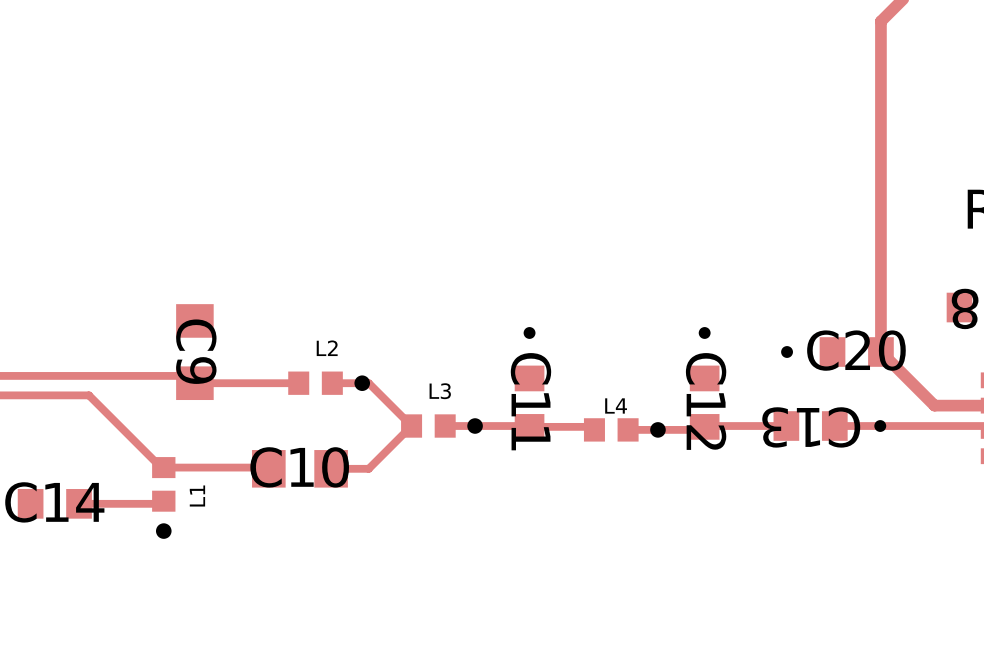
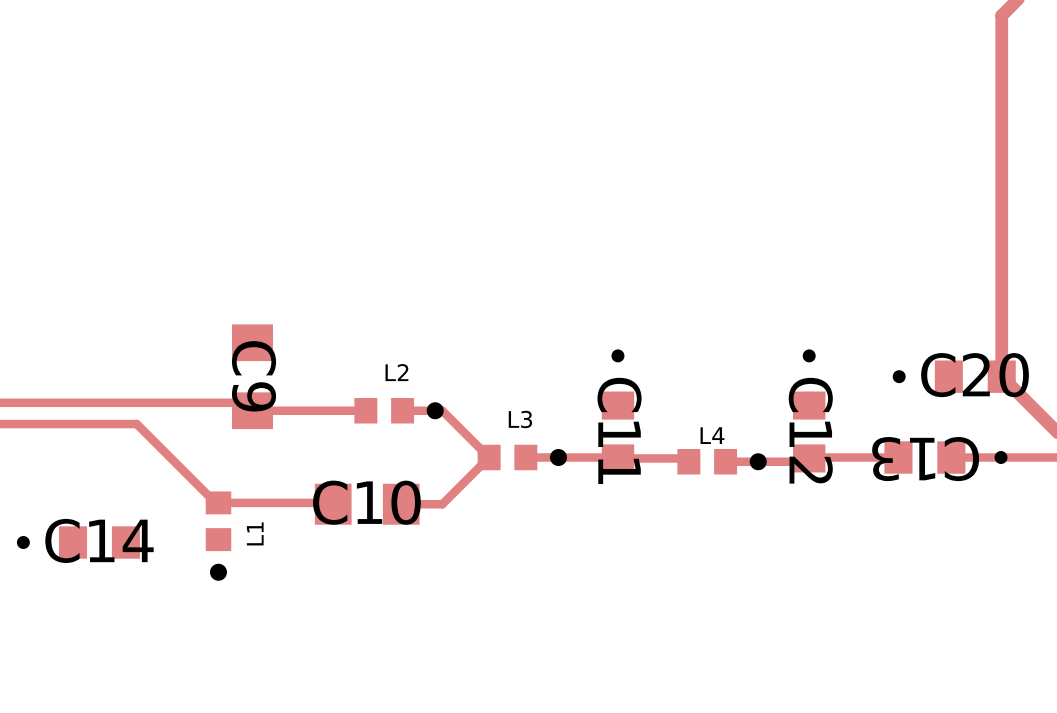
track: (163, 501) (161, 503) (79, 503) -> none

